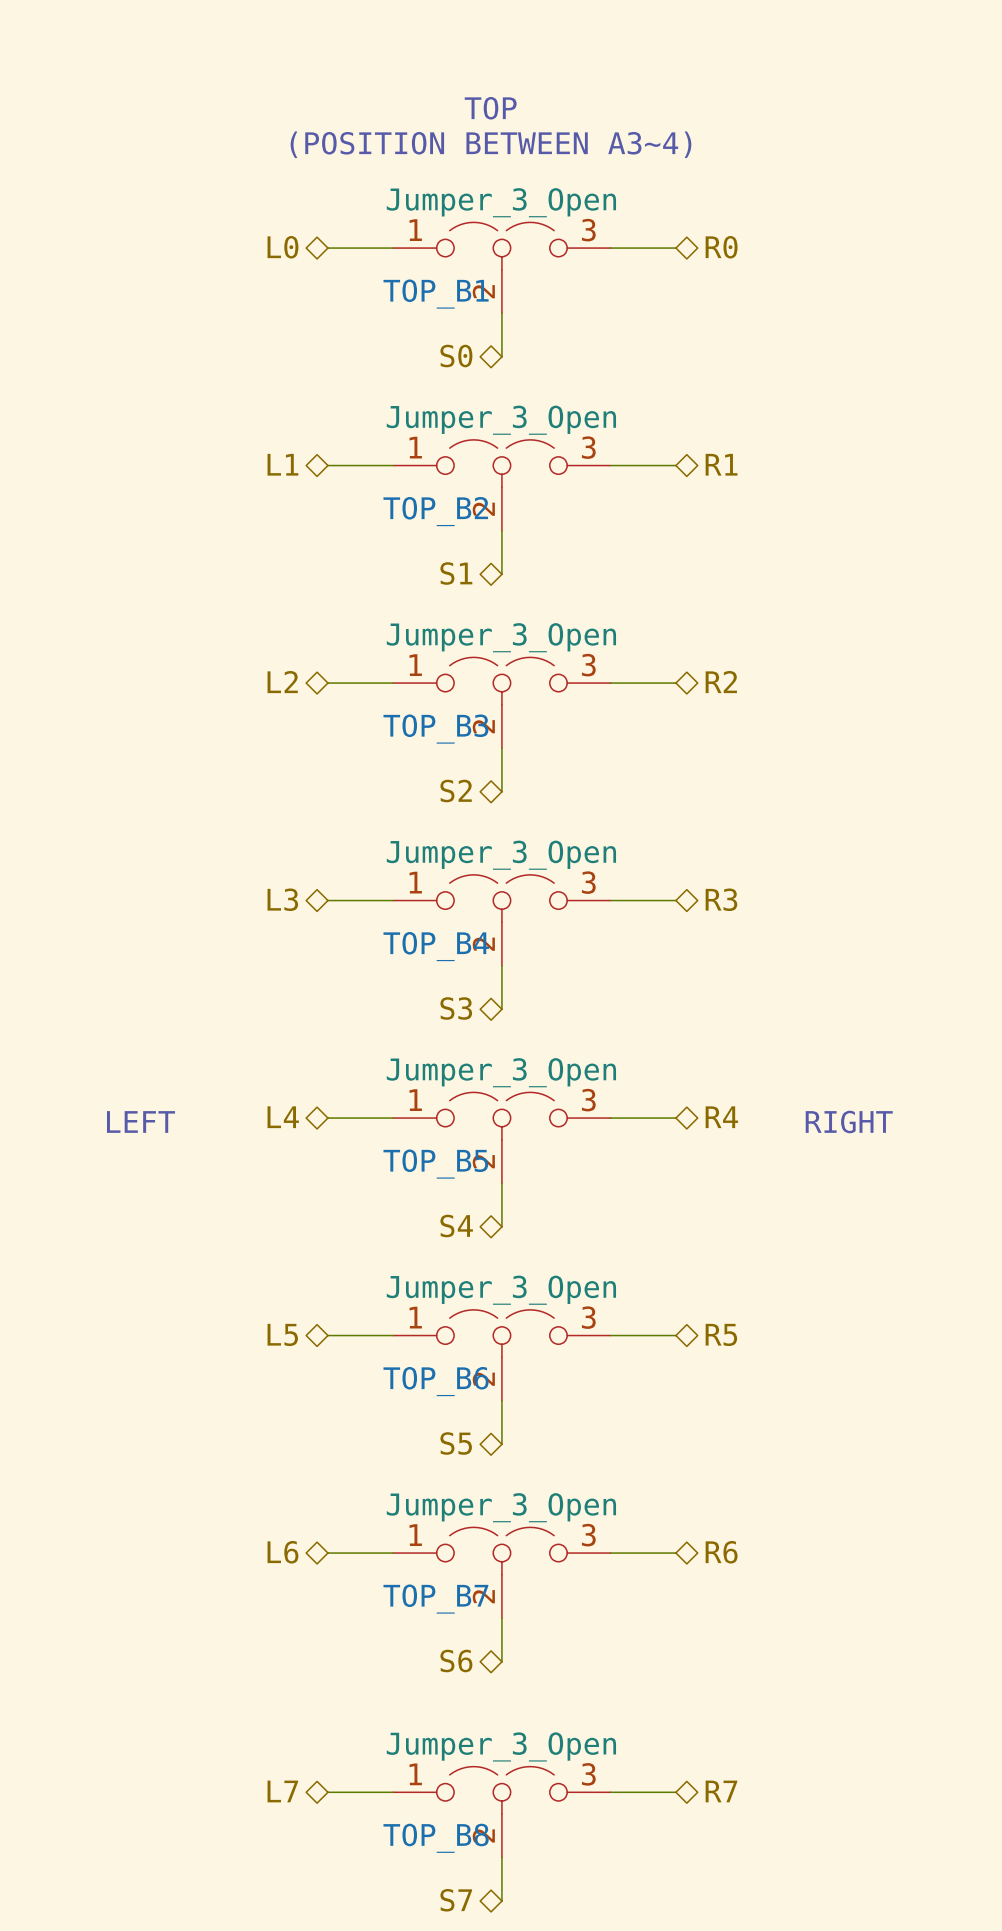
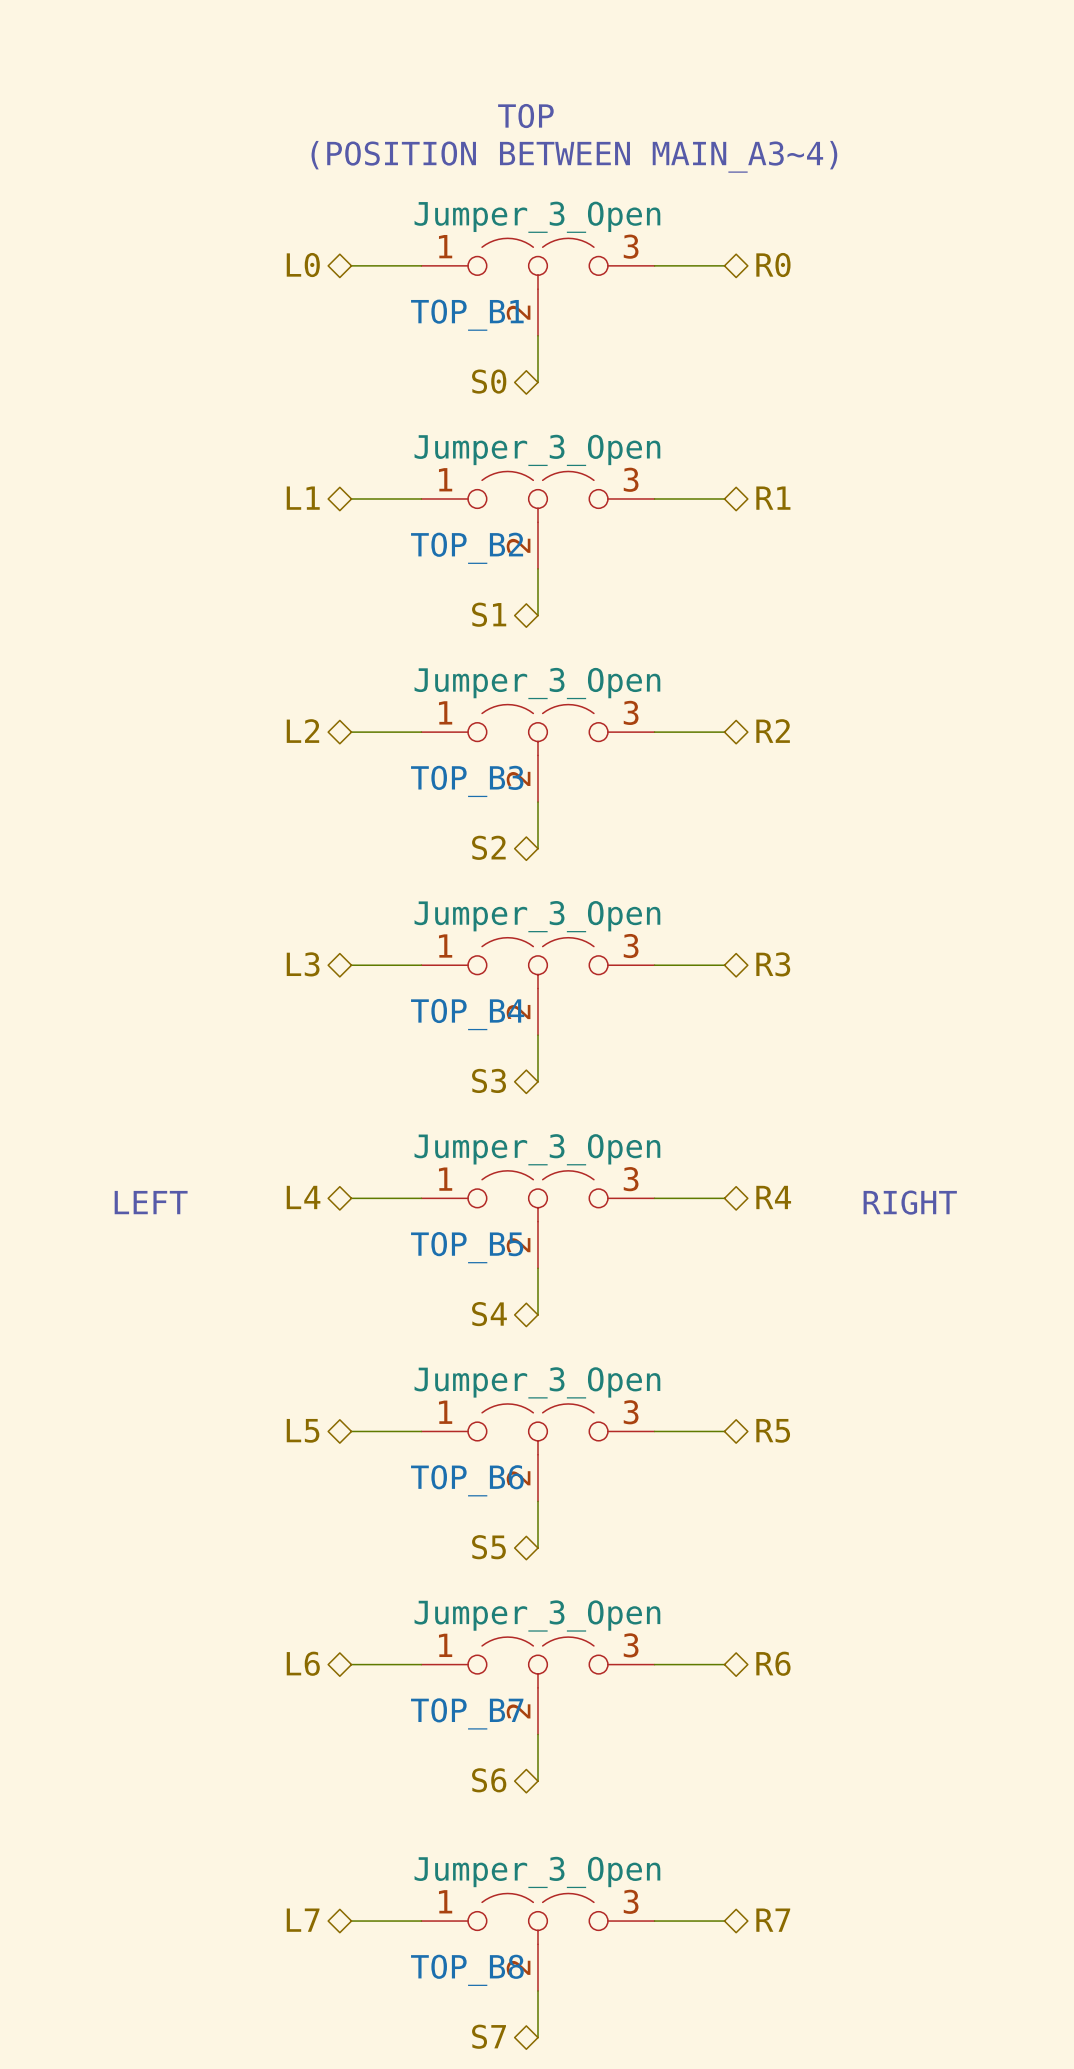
text: (POSITION BETWEEN A3~4) (490, 144) -> (POSITION BETWEEN MAIN_A3~4) (574, 156)

